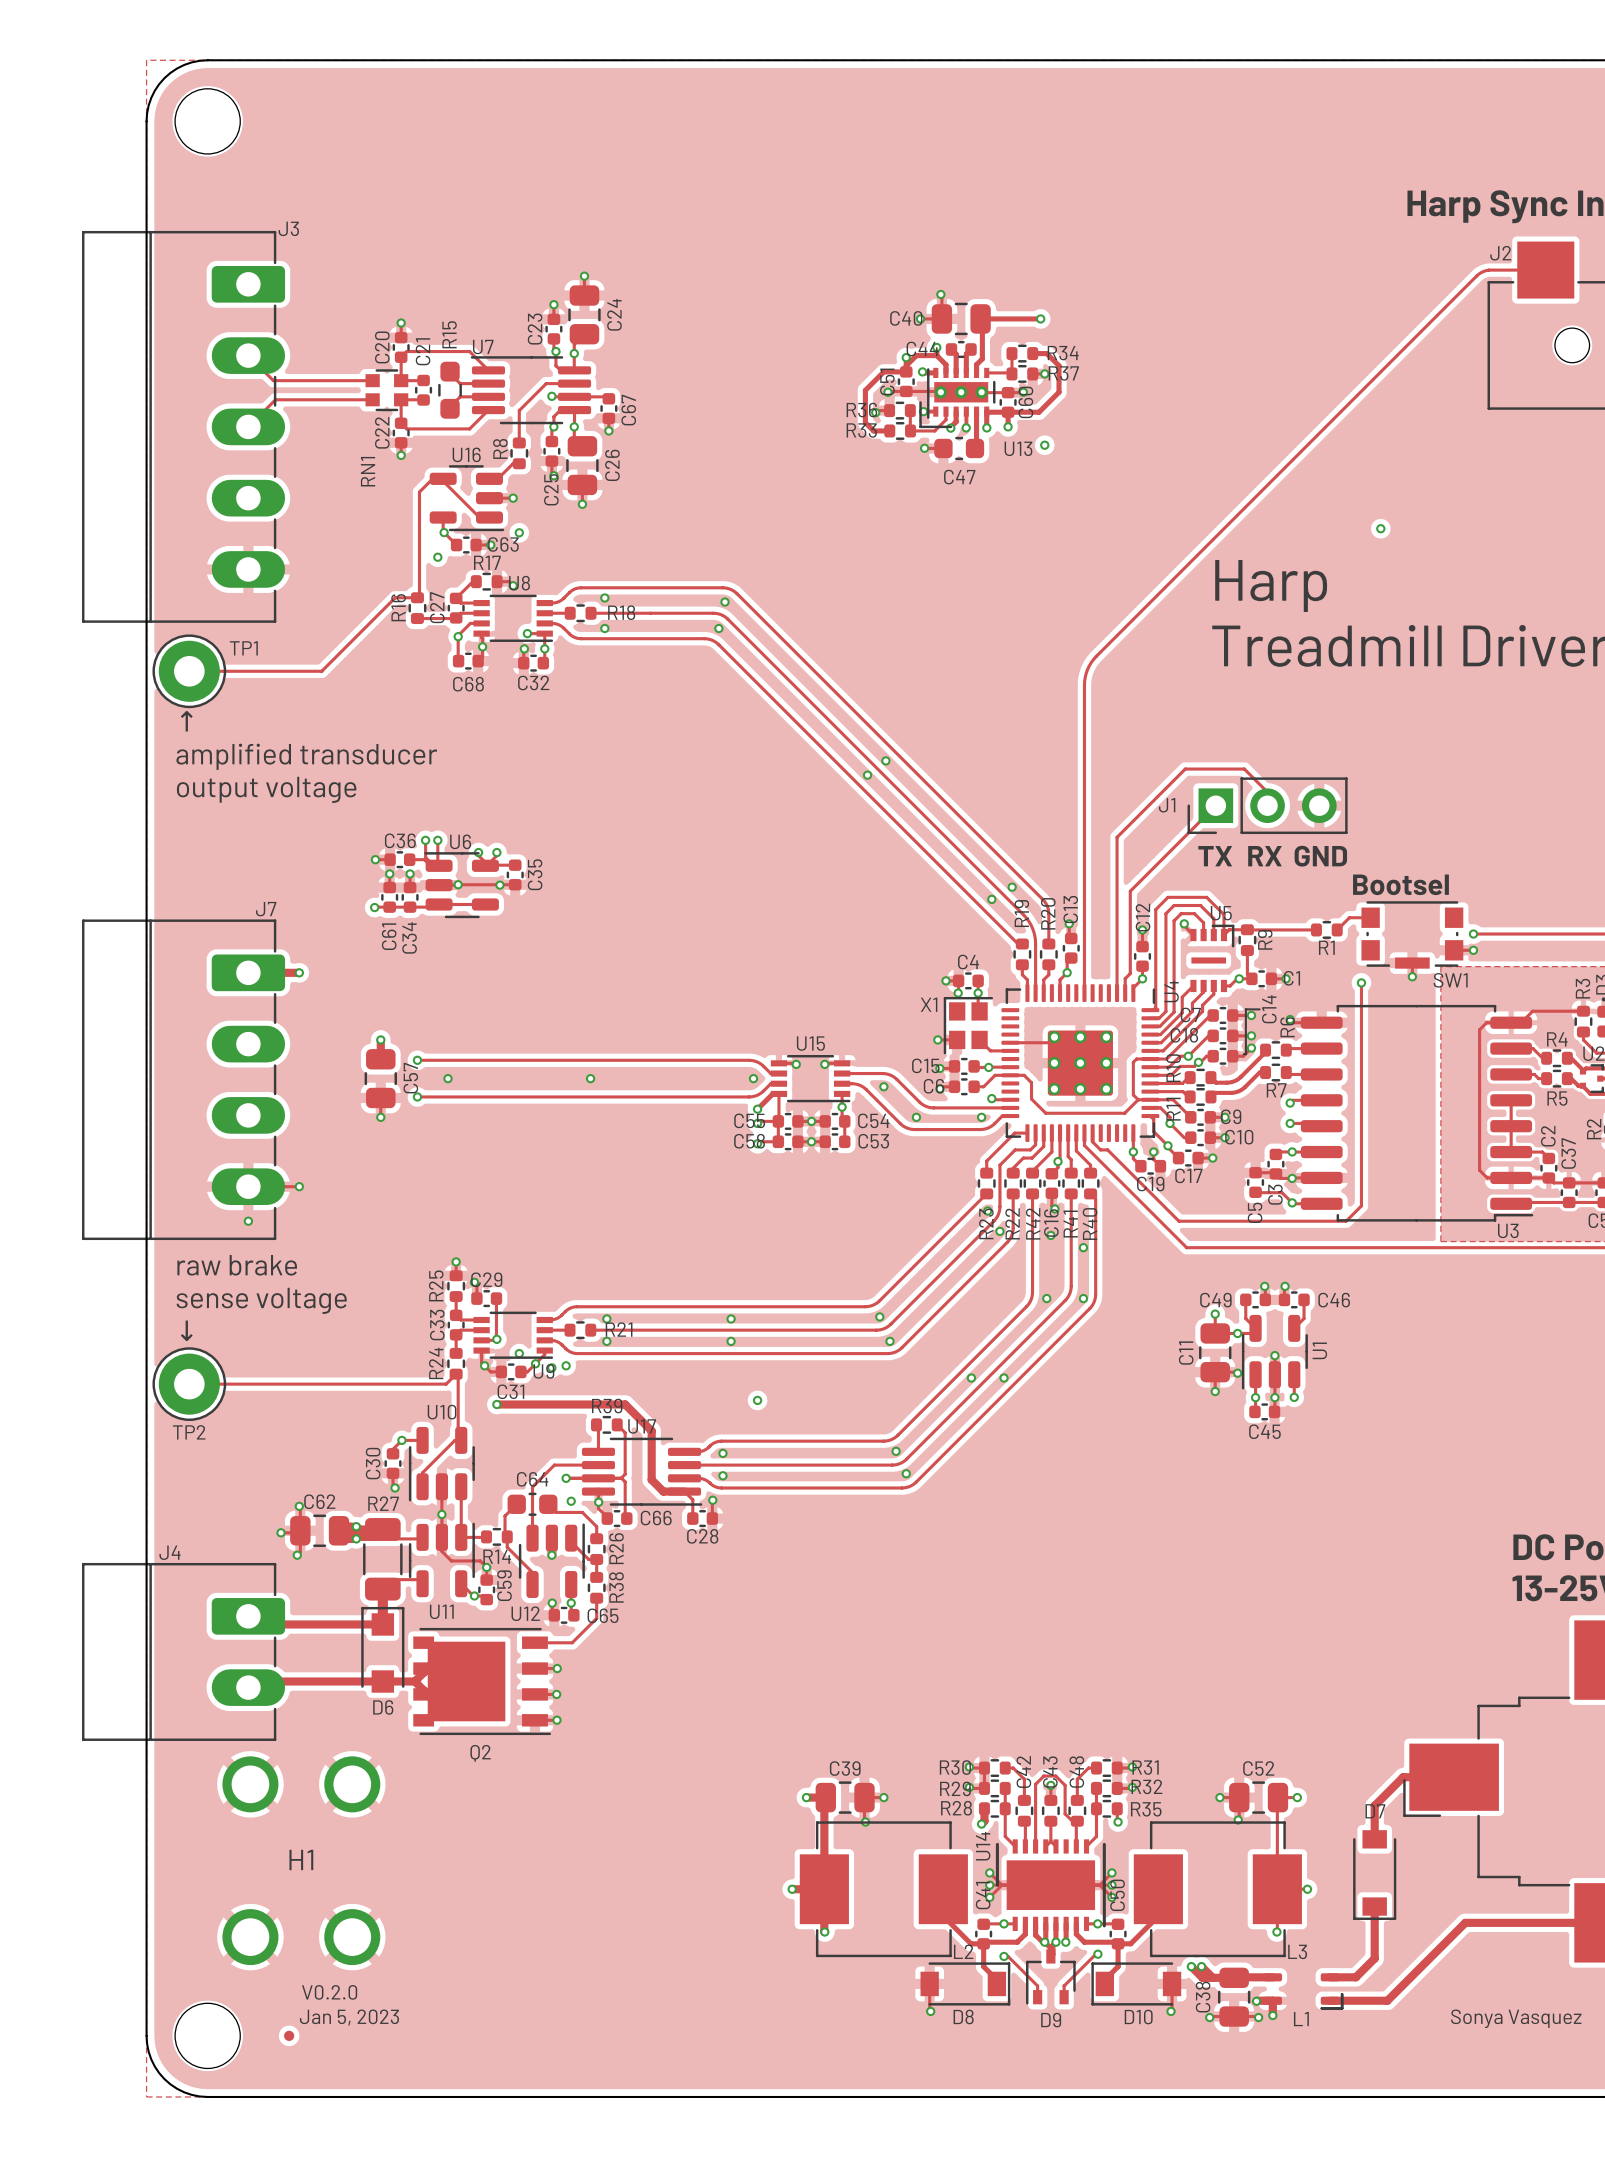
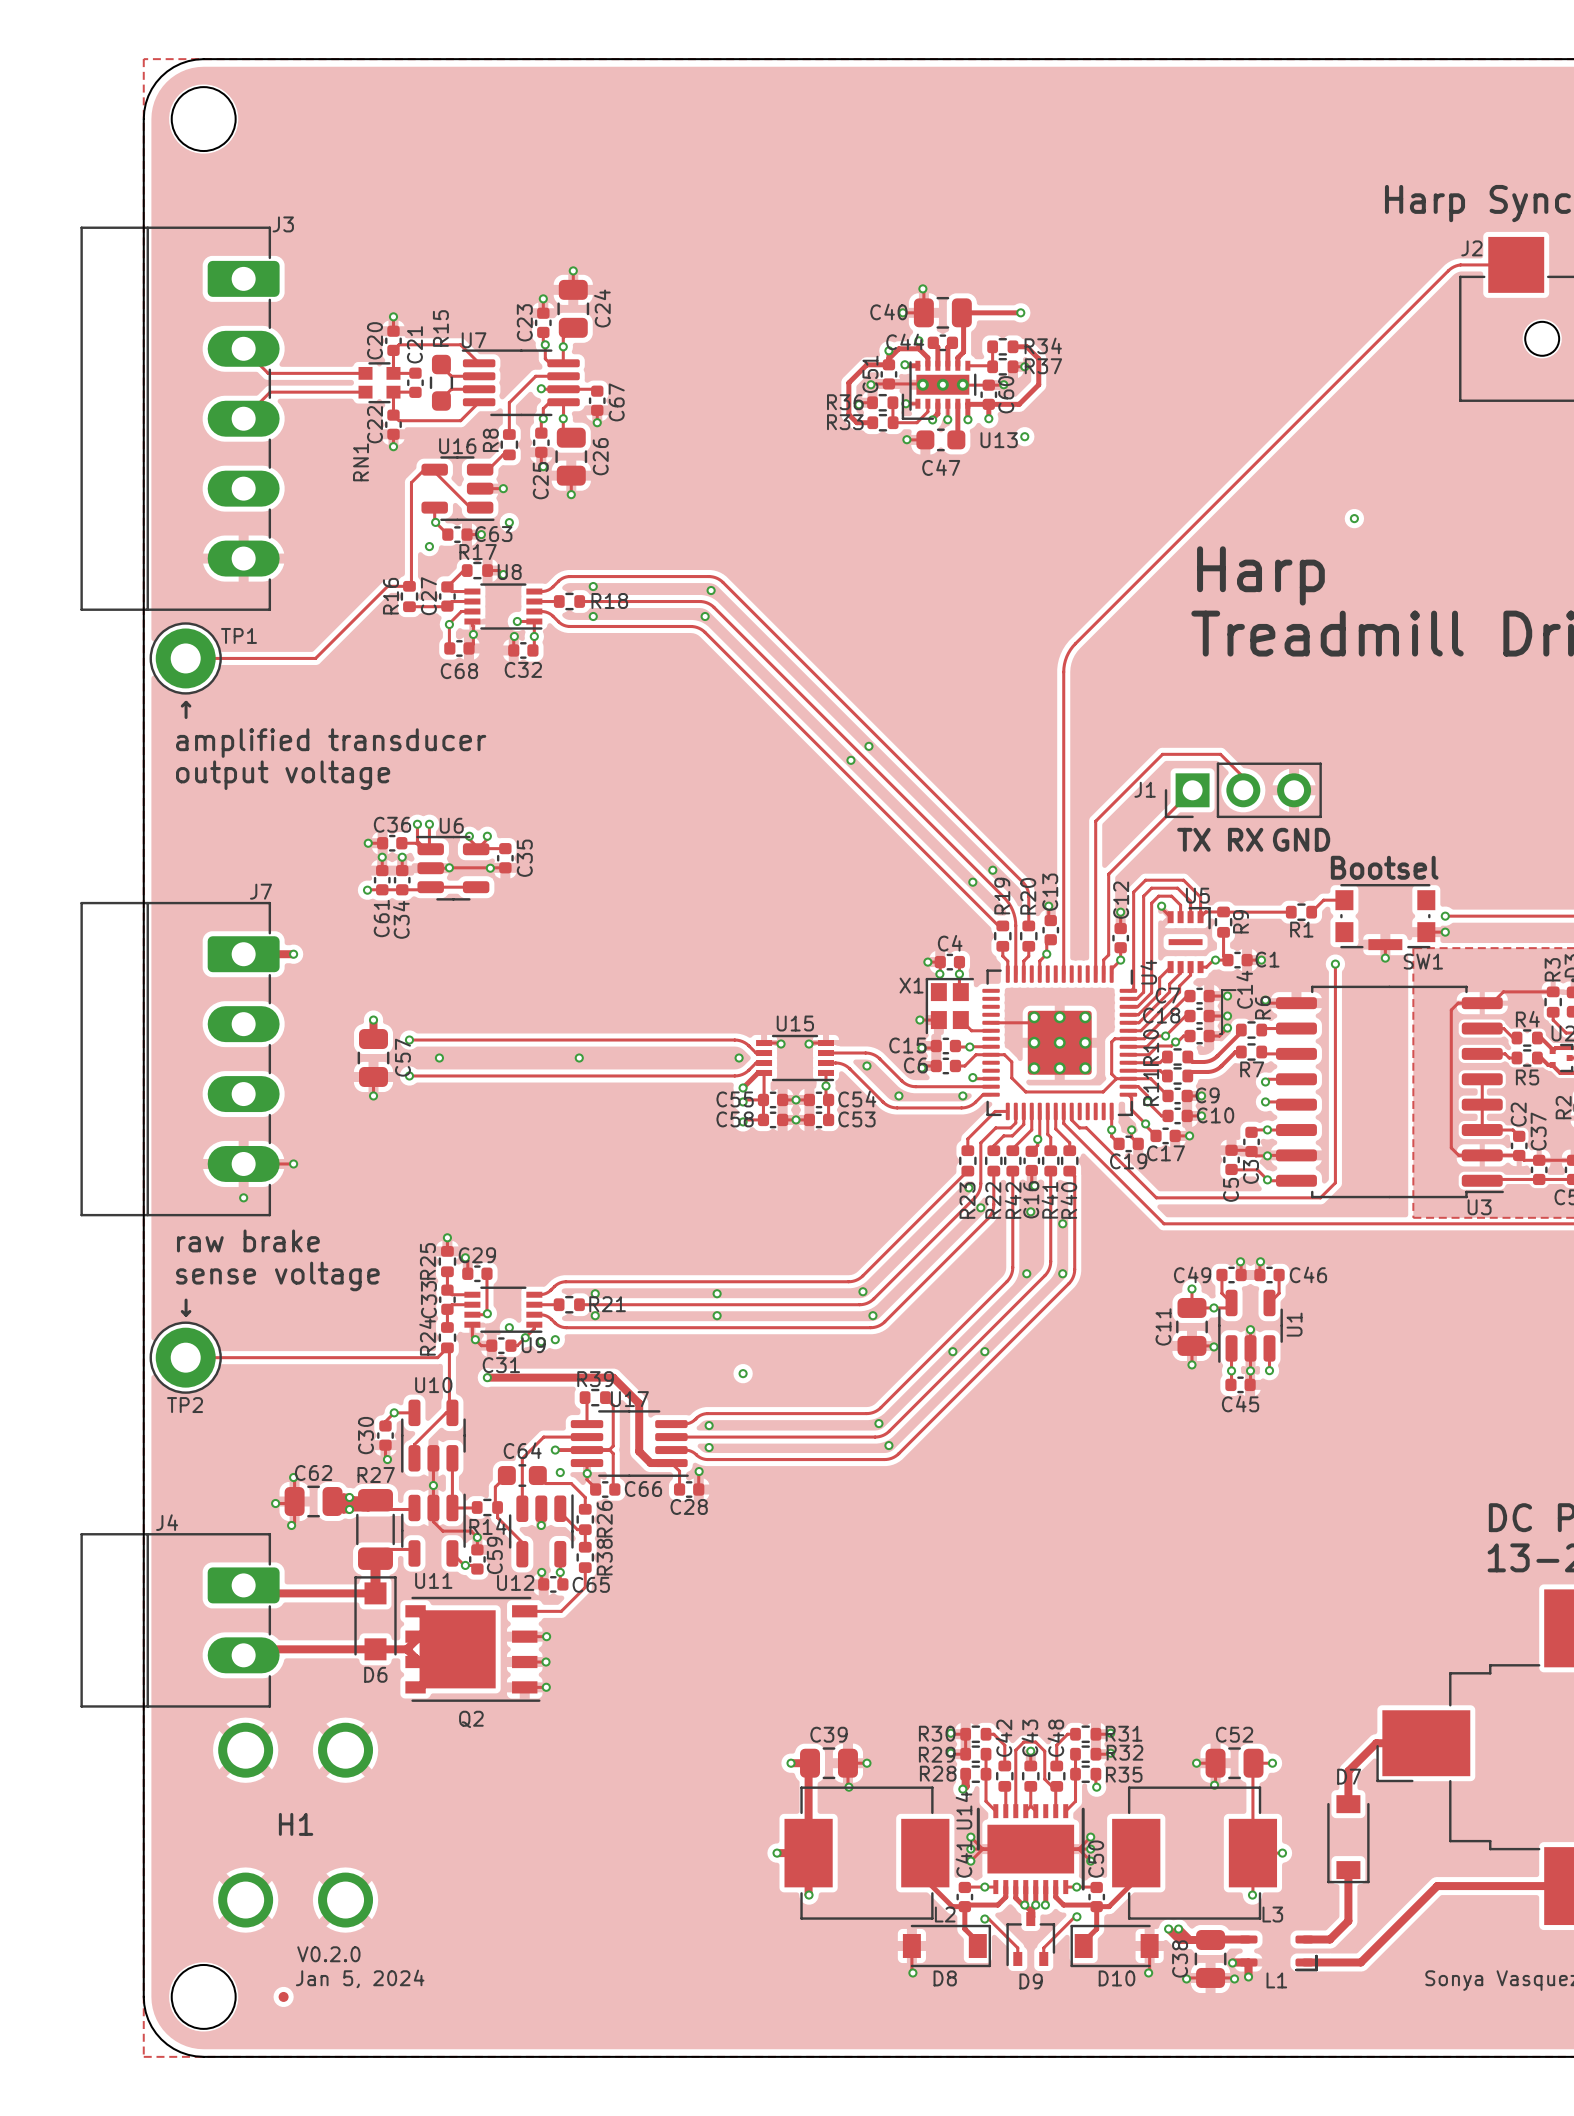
text: Jan 5, 2023 (349, 2017) -> Jan 5, 2024 (360, 1978)

